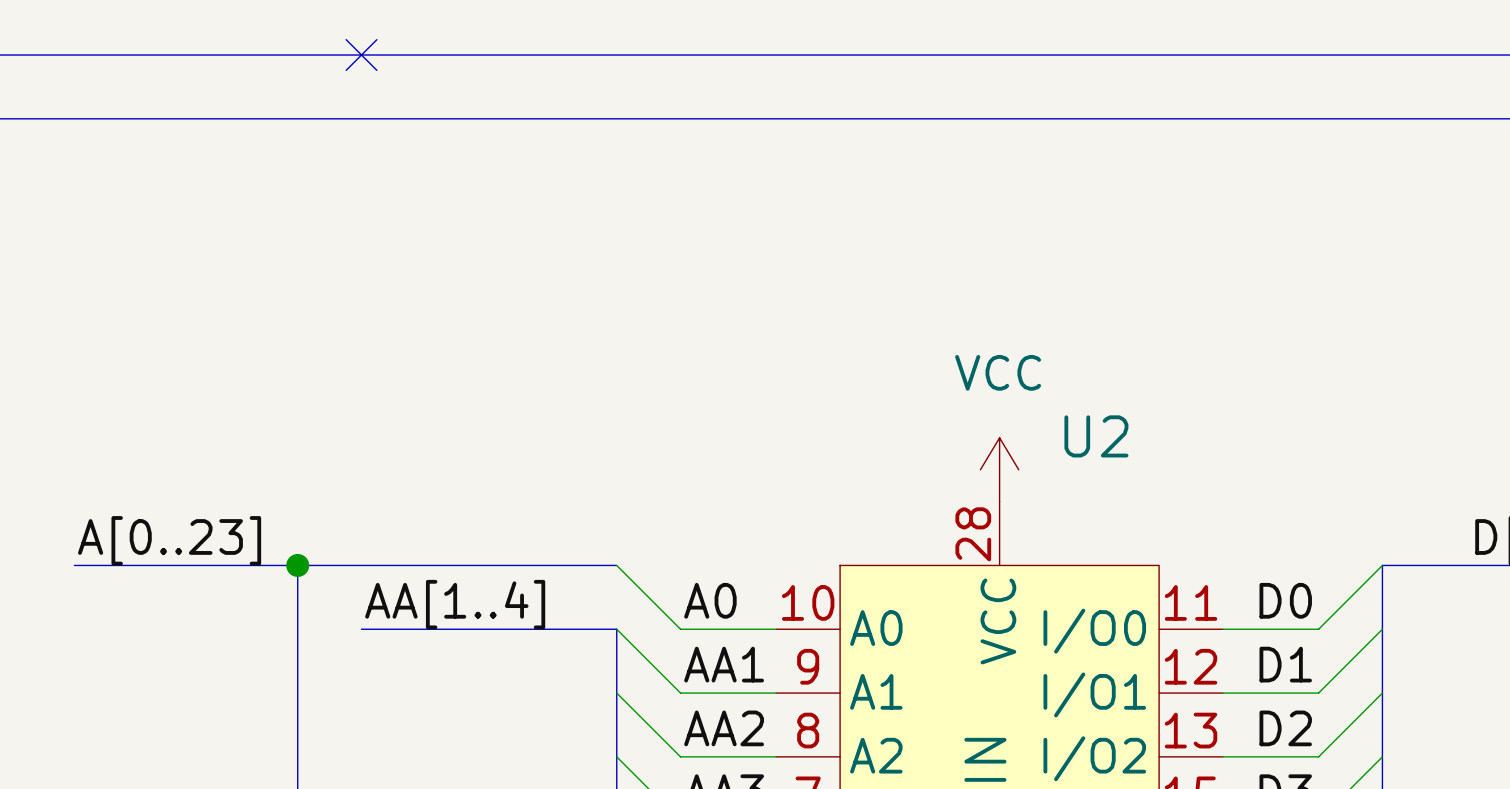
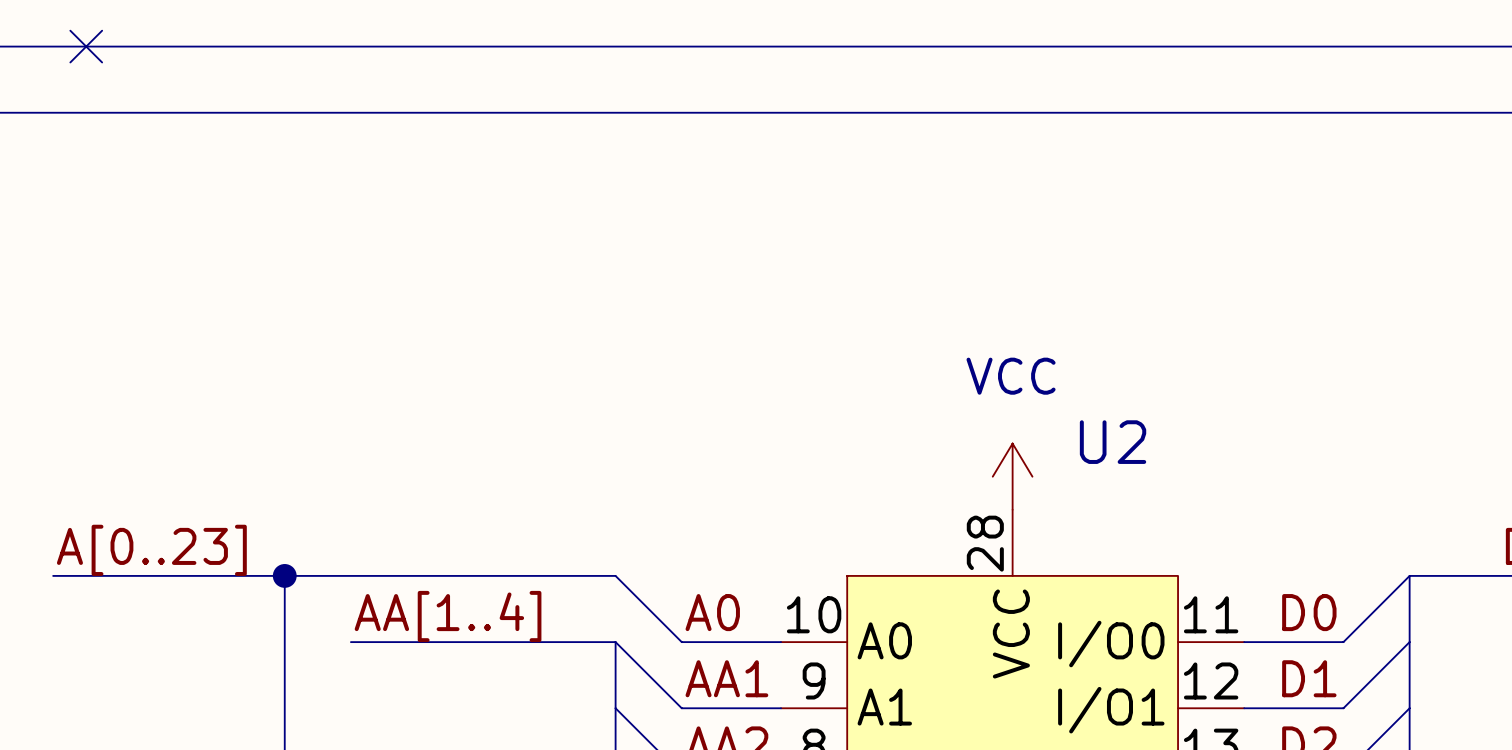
no-connect mark: none -> (86, 46)
no-connect mark: (361, 55) -> none

